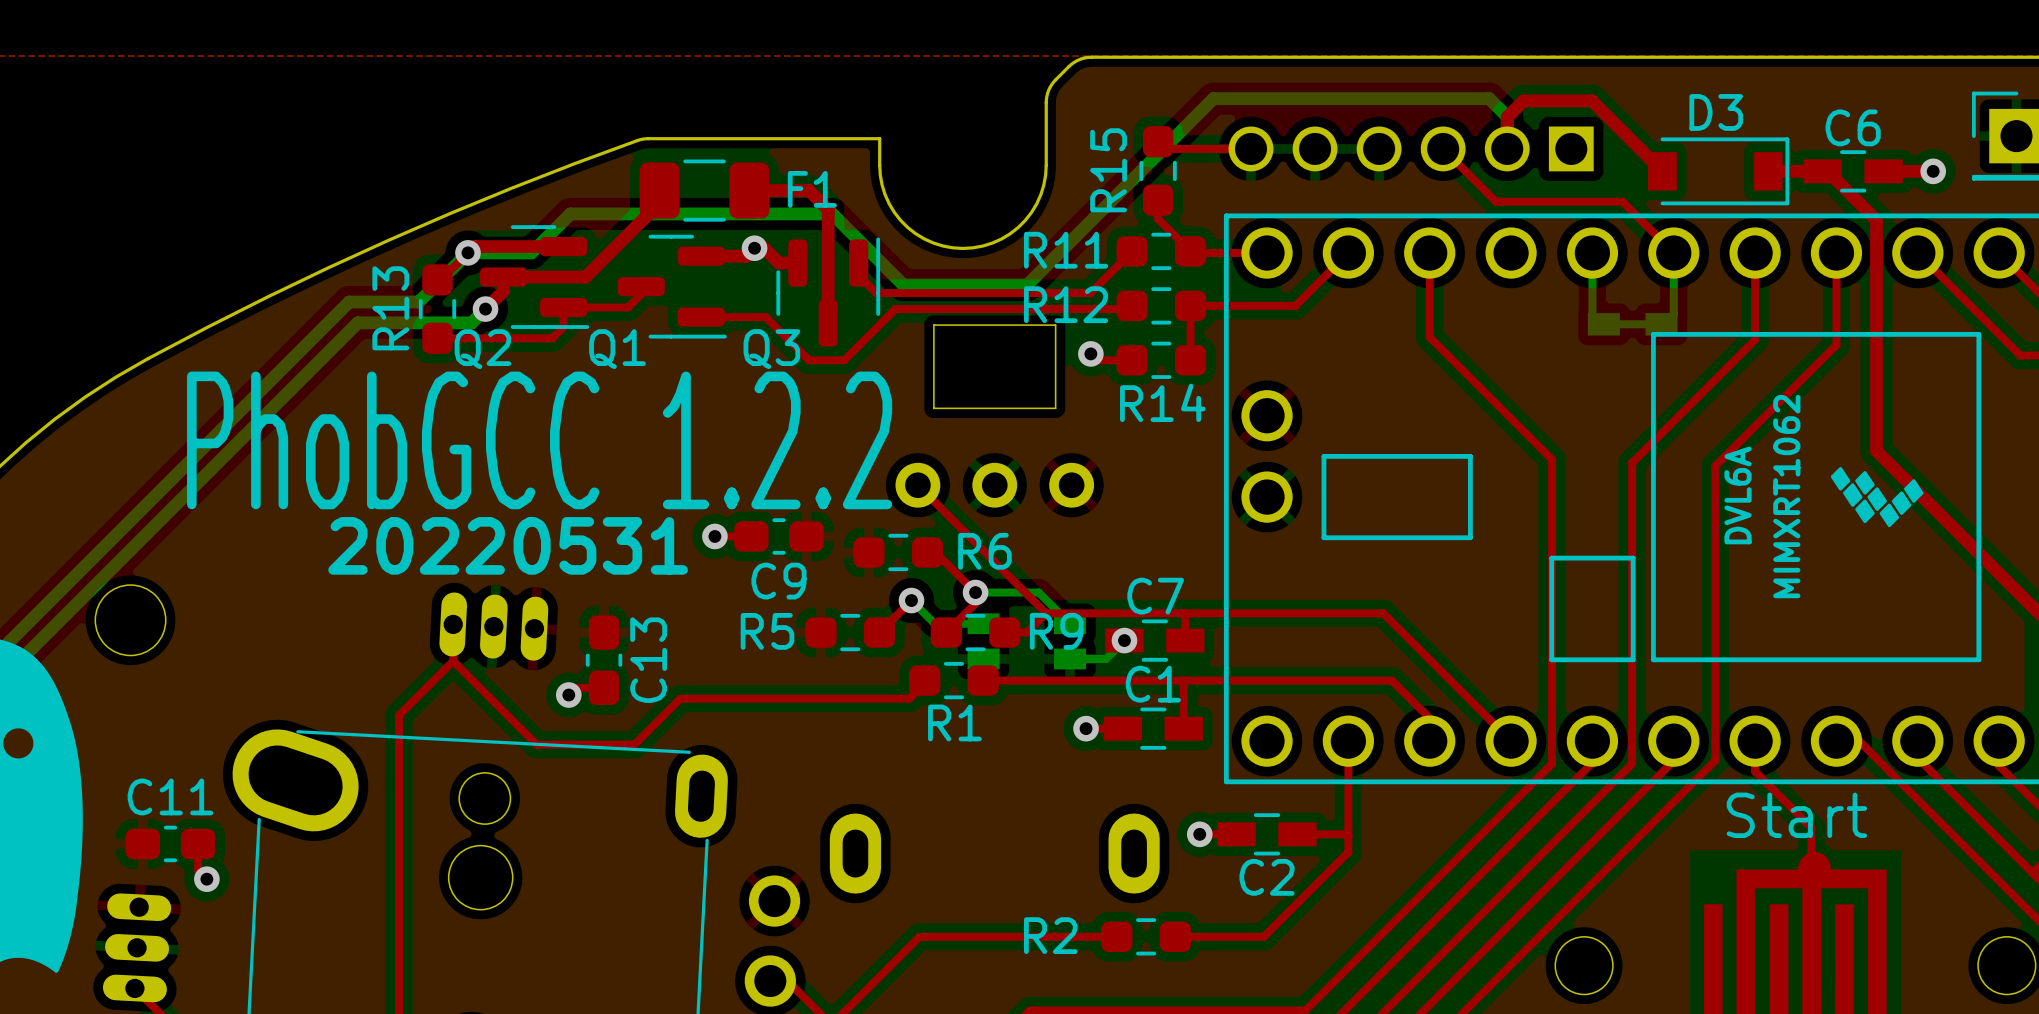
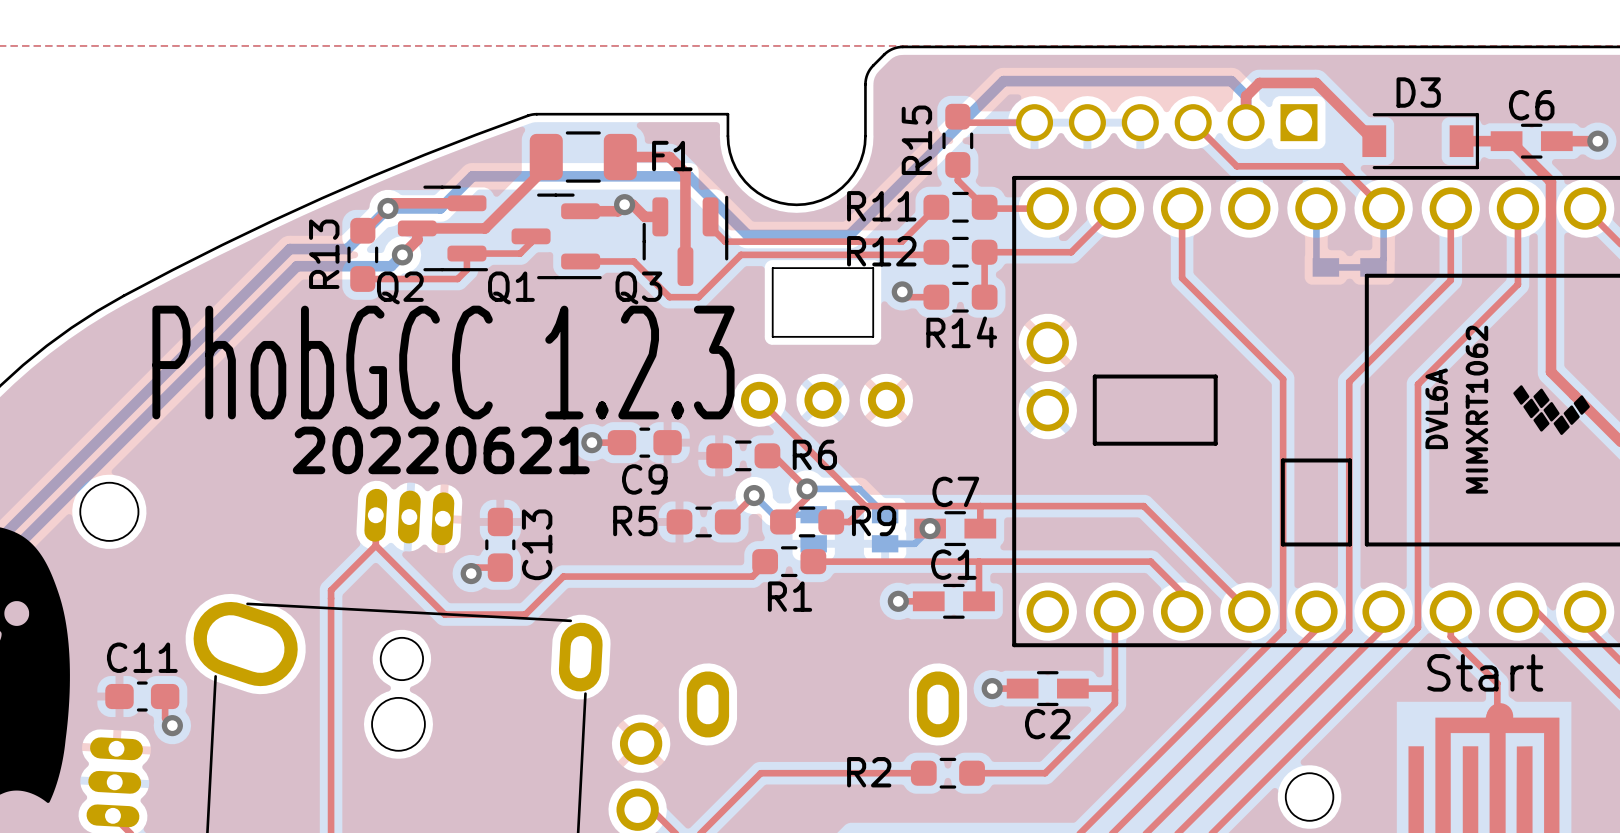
text: PhobGCC 1.2.2 (539, 440) -> PhobGCC 1.2.3 (443, 362)
text: 20220531 (508, 545) -> 20220621 (441, 450)

